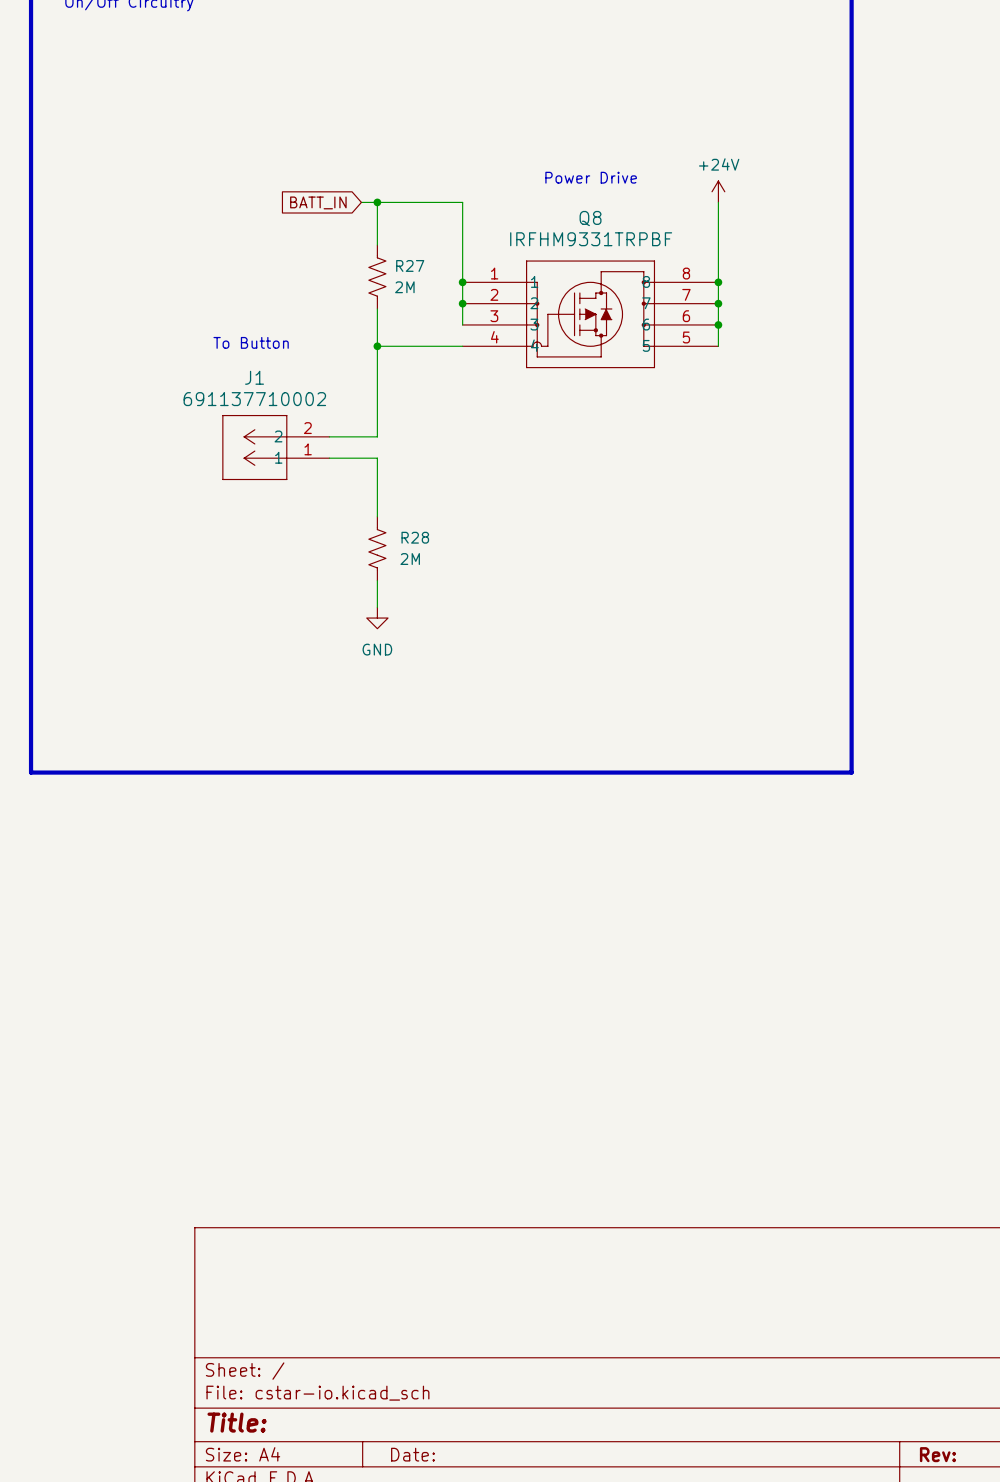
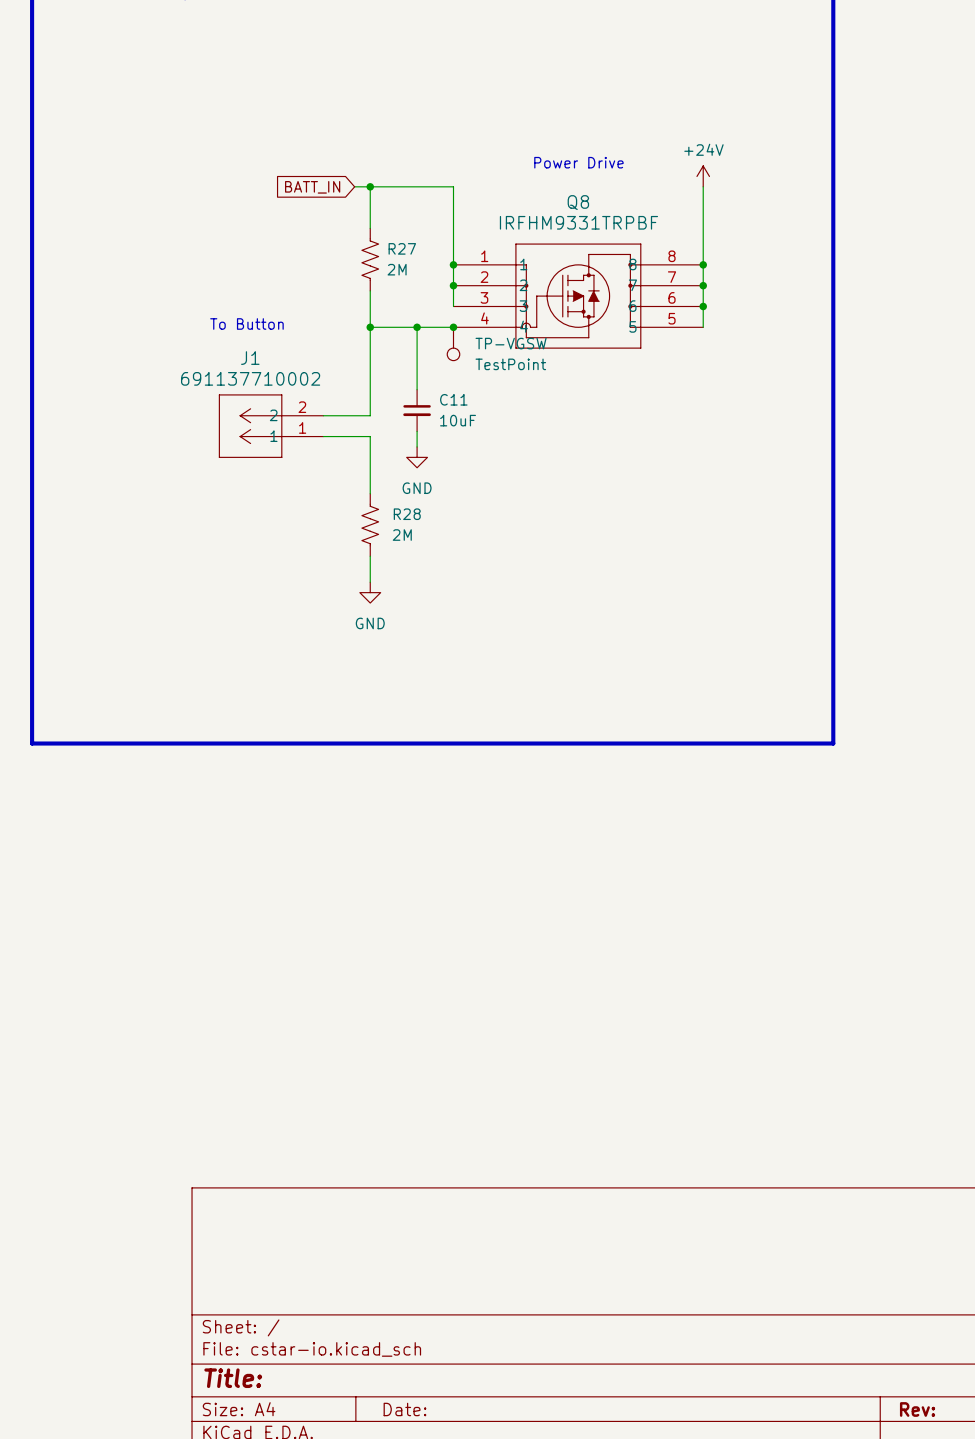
wire: none -> (417, 327) (417, 389)
junction: none -> (417, 327)
junction: none -> (453, 327)
TP-VGSW: none -> TestPoint (453, 343)
C11: none -> 10uF (417, 410)
wire: none -> (417, 431) (417, 446)
power symbol: none -> GND (417, 457)

